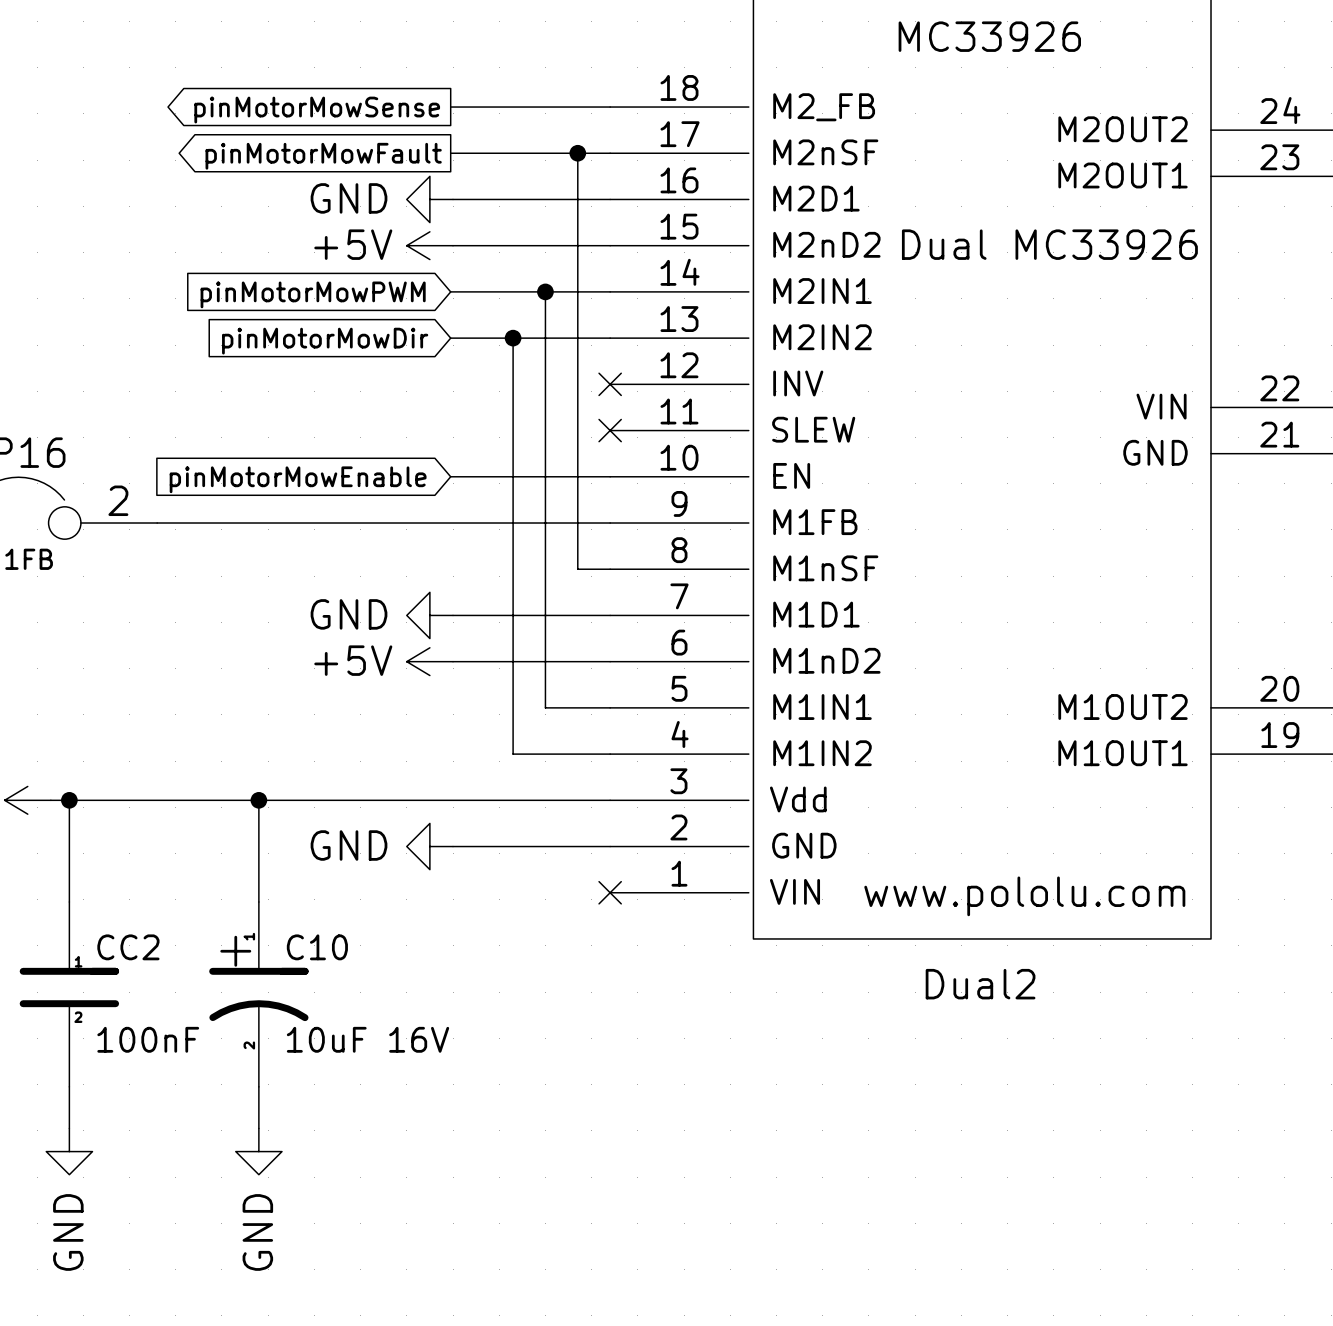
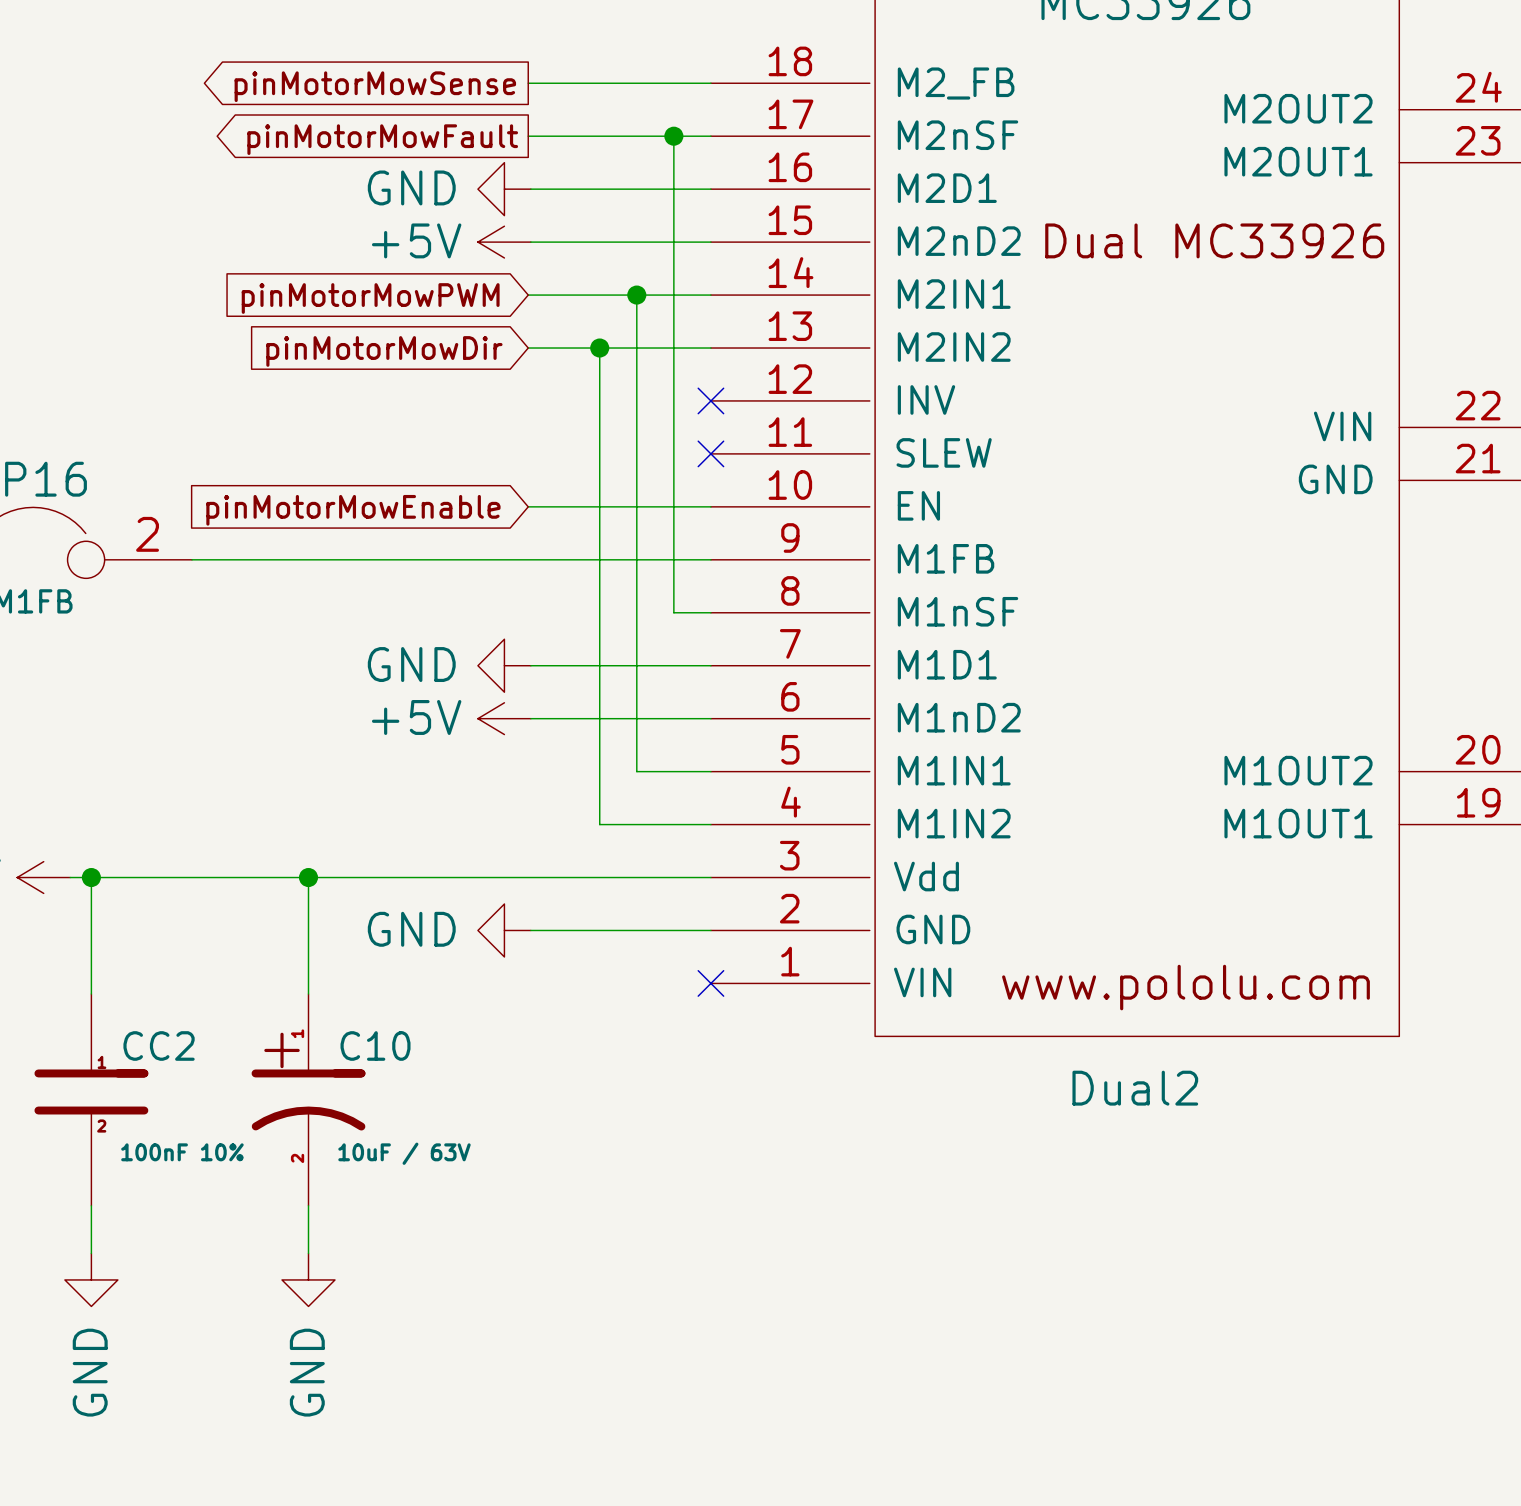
CC2 value: 100nF (148, 1039) -> 100nF 10% (182, 1152)
C10 value: 10uF 16V (368, 1039) -> 10uF / 63V (404, 1153)

